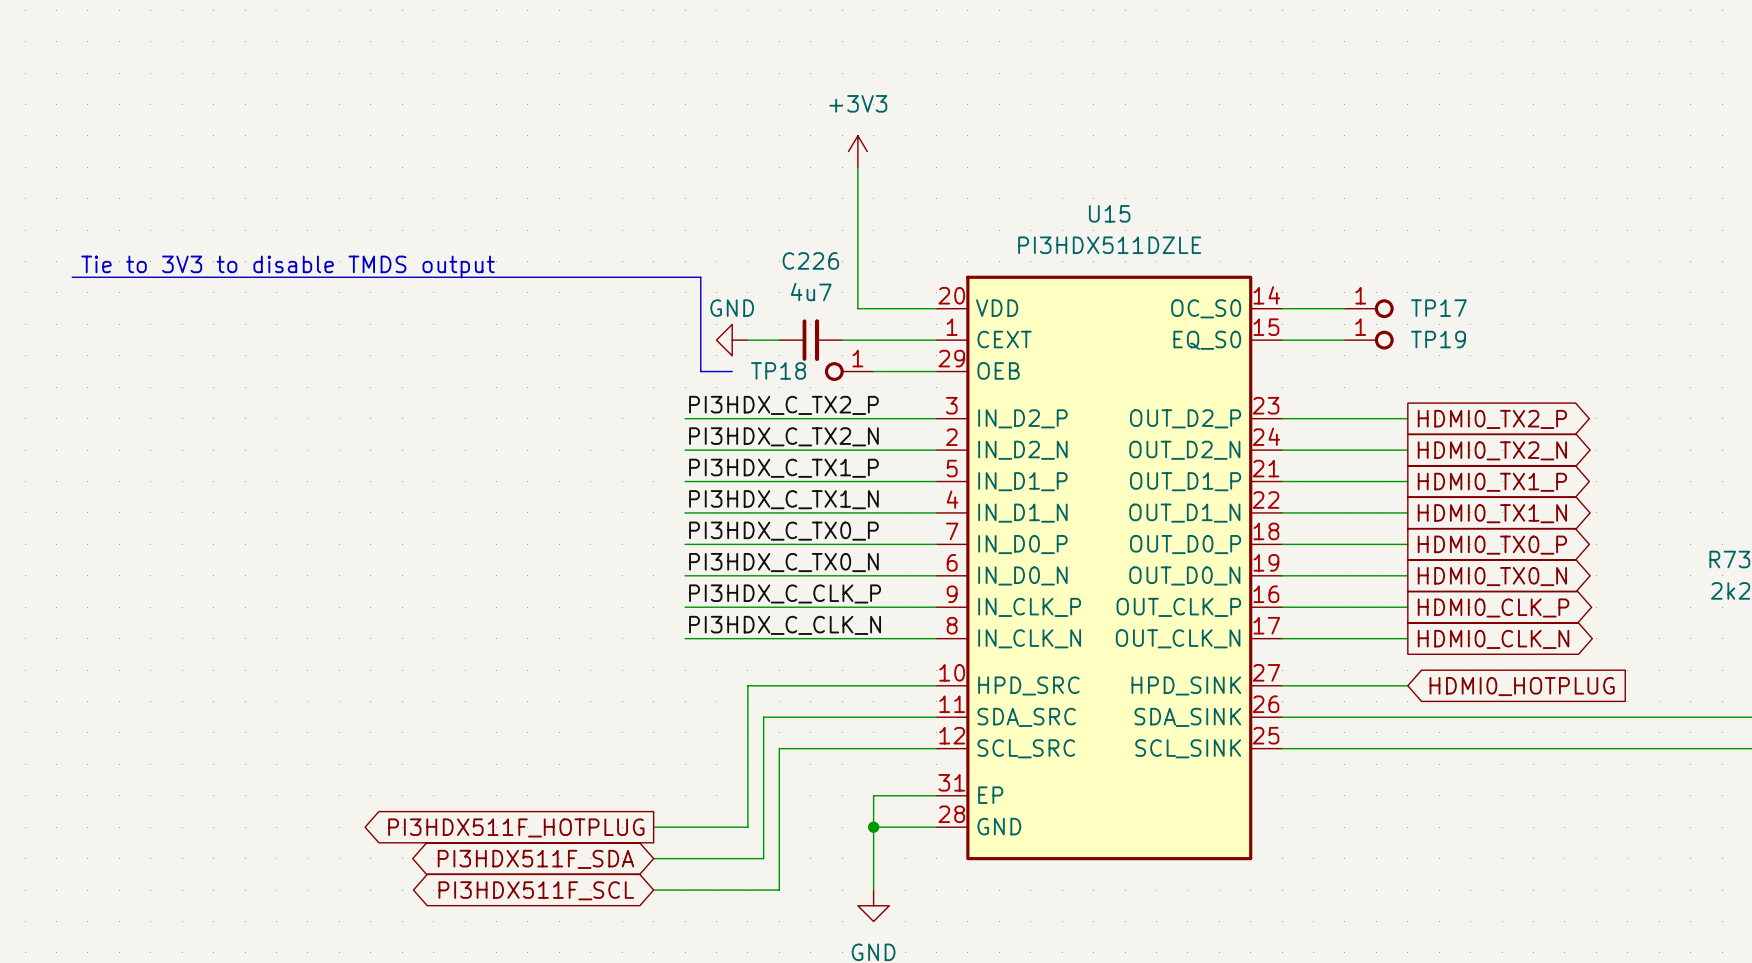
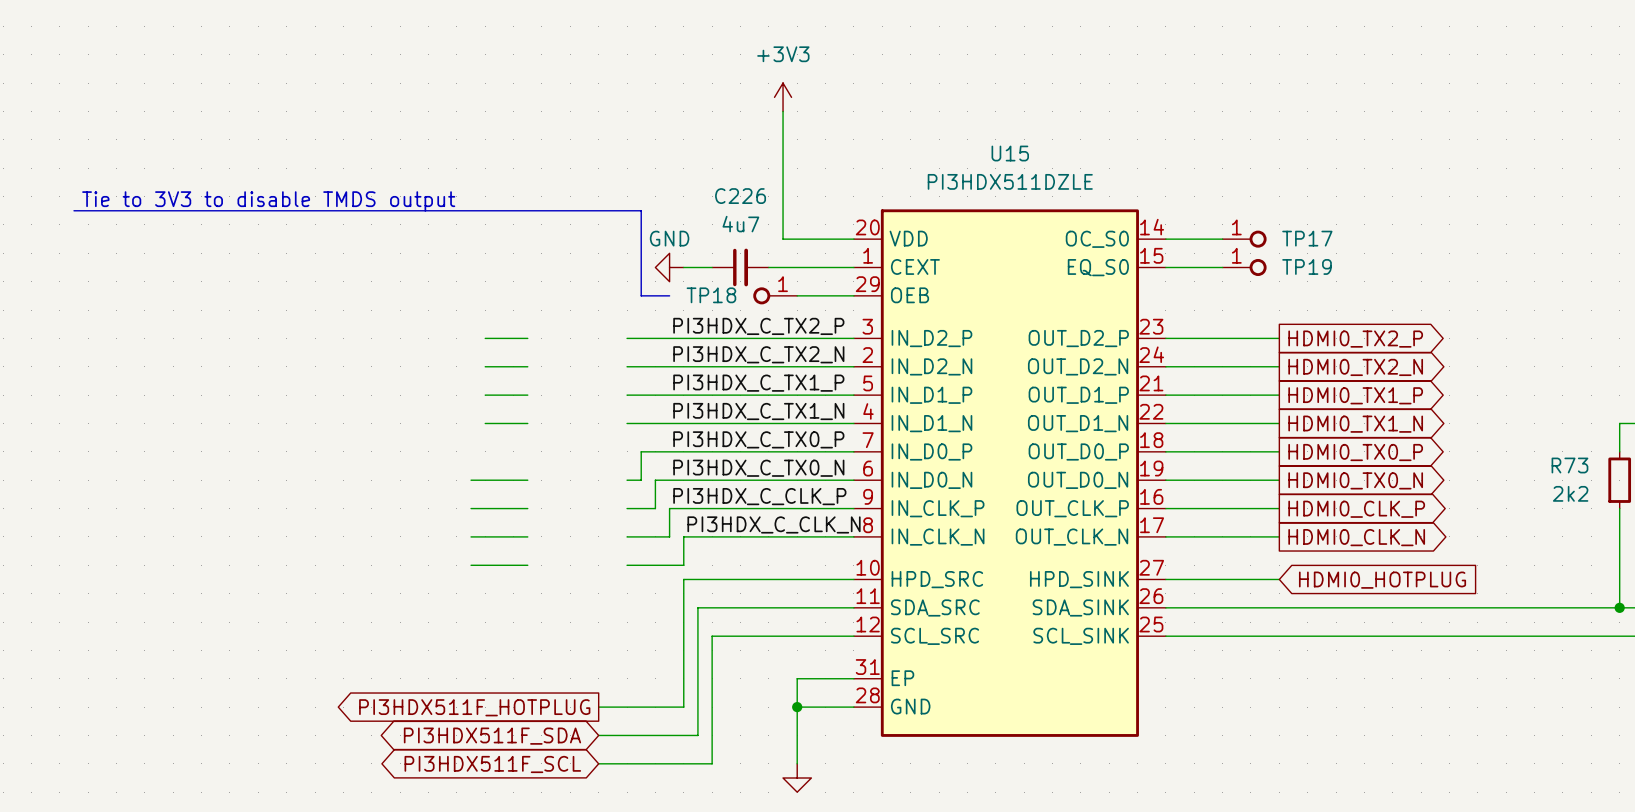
label position: PI3HDX_C_TX2_P (783, 405) -> PI3HDX_C_TX2_P (758, 326)
wire: none -> (485, 338) (527, 338)
label position: PI3HDX_C_TX2_N (783, 436) -> PI3HDX_C_TX2_N (758, 354)
wire: none -> (485, 366) (527, 366)
label position: PI3HDX_C_TX1_P (783, 468) -> PI3HDX_C_TX1_P (758, 383)
wire: none -> (485, 395) (527, 395)
label position: PI3HDX_C_TX1_N (783, 499) -> PI3HDX_C_TX1_N (758, 411)
wire: none -> (485, 423) (527, 423)
label position: PI3HDX_C_TX0_P (783, 531) -> PI3HDX_C_TX0_P (758, 439)
wire: (685, 544) (700, 544) -> (641, 480) (641, 451)
label position: PI3HDX_C_TX0_N (783, 562) -> PI3HDX_C_TX0_N (758, 468)
wire: none -> (471, 480) (527, 480)
wire: (700, 575) (716, 575) -> none
label position: PI3HDX_C_CLK_P (785, 593) -> PI3HDX_C_CLK_P (759, 496)
wire: none -> (471, 508) (527, 508)
wire: (716, 607) (732, 607) -> (655, 508) (655, 480)
label position: PI3HDX_C_CLK_N (785, 625) -> PI3HDX_C_CLK_N (774, 524)
wire: none -> (471, 536) (527, 536)
wire: (732, 638) (747, 638) -> (669, 536) (669, 508)
wire: none -> (683, 536) (683, 565) (627, 565)
wire: none -> (471, 565) (527, 565)

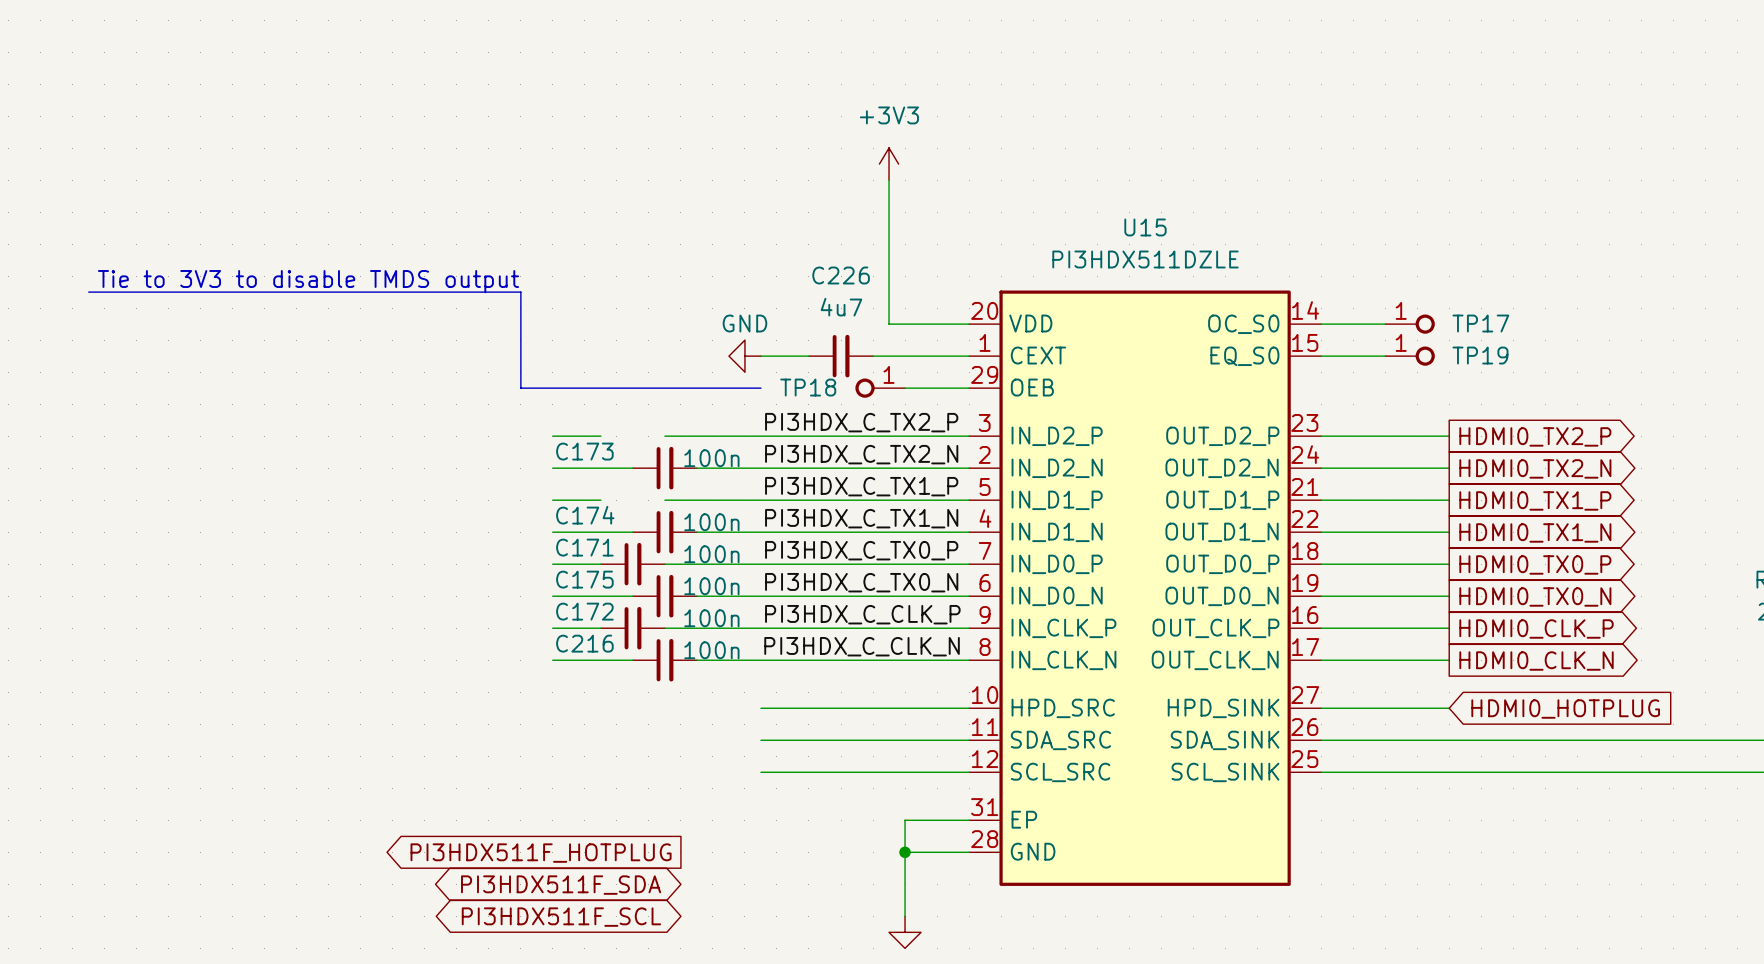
line: (456, 210) (641, 210) (641, 295) -> (520, 292) (520, 388) (728, 388)
power symbol position: GND (669, 267) -> GND (744, 356)
wire: none -> (664, 436) (712, 436)
wire: none -> (600, 468) (632, 468)
C173: none -> (664, 468)
wire: none -> (696, 468) (712, 468)
wire: none -> (664, 500) (712, 500)
wire: none -> (600, 532) (632, 532)
C174: none -> (664, 532)
wire: none -> (552, 564) (600, 564)
C171: none -> (632, 564)
wire: (641, 451) (641, 480) -> (744, 596) (728, 596)
wire: (471, 480) (485, 480) -> (696, 596) (712, 596)
wire: none -> (600, 596) (632, 596)
C175: none -> (664, 596)
wire: (655, 480) (655, 508) -> (760, 628) (744, 628)
wire: (471, 508) (485, 508) -> (696, 532) (712, 532)
C172: none -> (632, 628)
wire: none -> (664, 628) (712, 628)
wire: (669, 508) (669, 536) -> (776, 660) (760, 660)
label position: PI3HDX_C_CLK_N (774, 524) -> PI3HDX_C_CLK_N (862, 646)
wire: (471, 536) (485, 536) -> (696, 660) (712, 660)
wire: none -> (600, 660) (632, 660)
C216: none -> (664, 660)
wire: (683, 536) (683, 565) (627, 565) -> none
wire: (471, 565) (527, 565) -> (664, 564) (728, 564)
wire: (683, 579) (683, 707) (598, 707) -> (776, 708) (760, 708)
wire: (697, 607) (697, 735) (598, 735) -> (792, 740) (760, 740)
wire: (712, 636) (712, 763) (598, 763) -> (808, 772) (760, 772)

